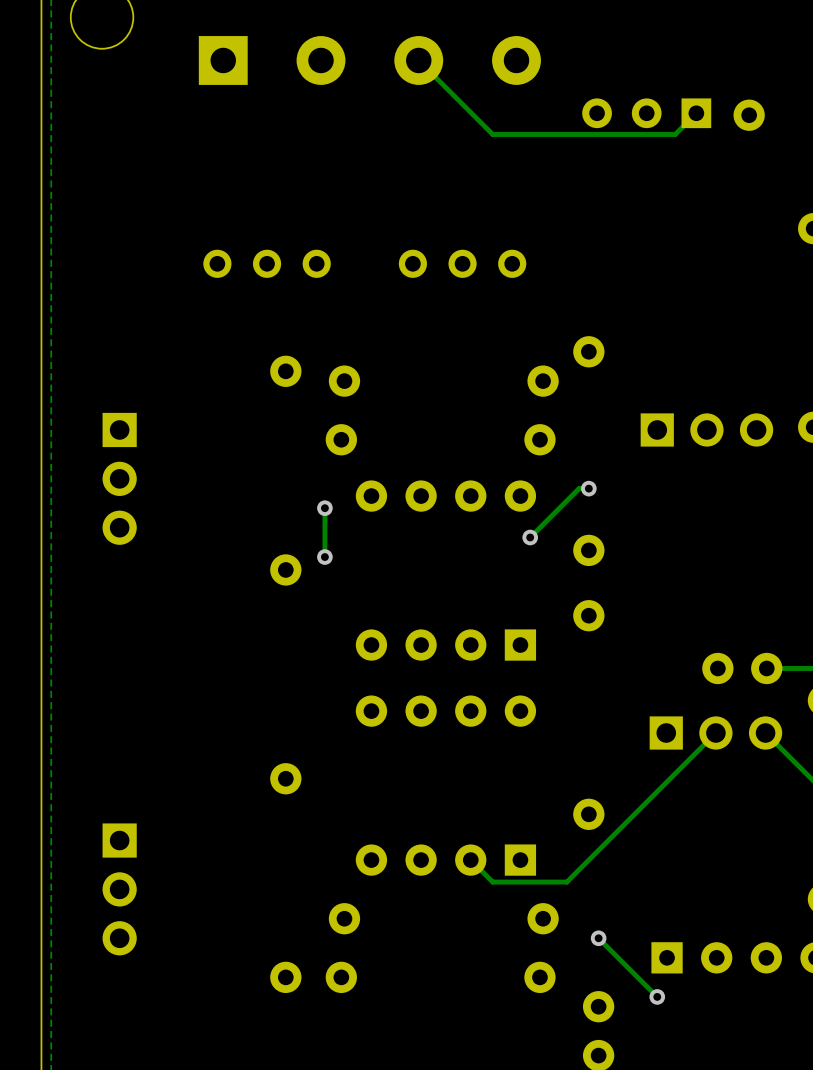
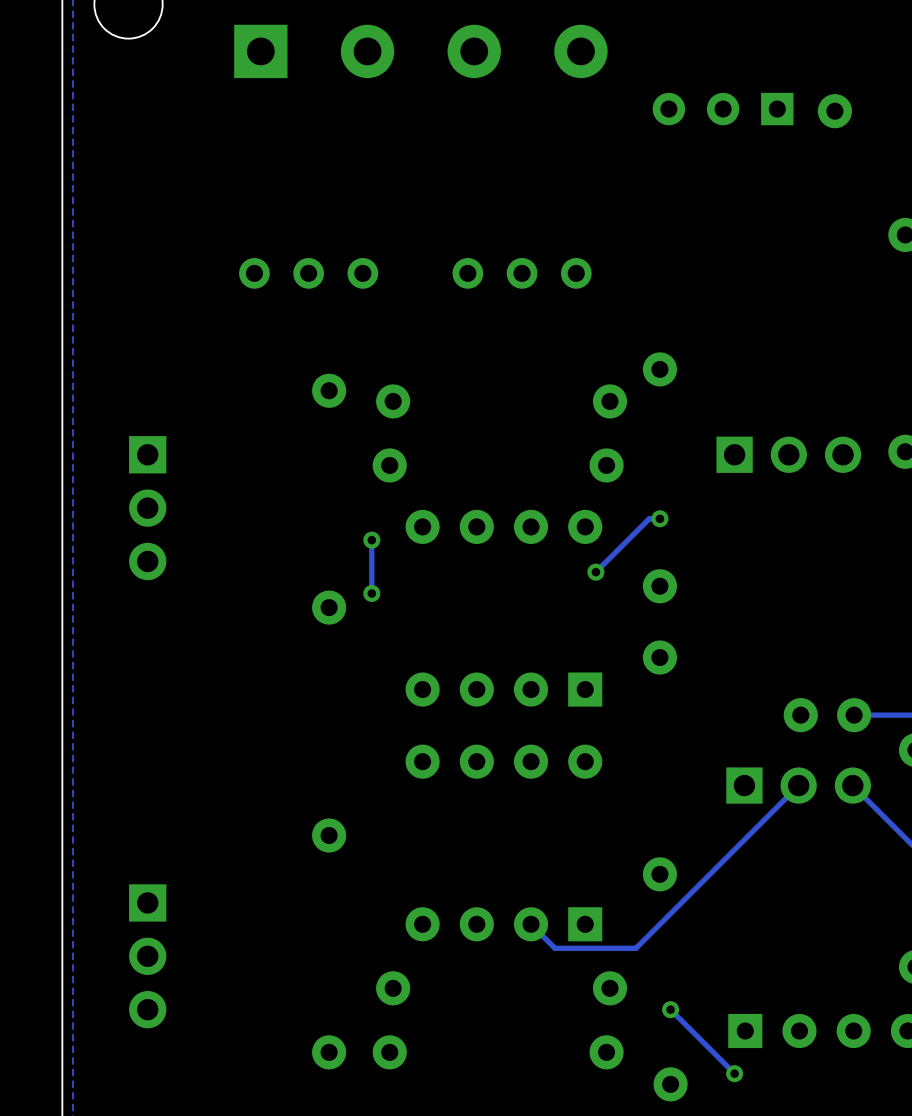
track: (418, 60) (492, 134) (675, 134) (696, 113) -> none

